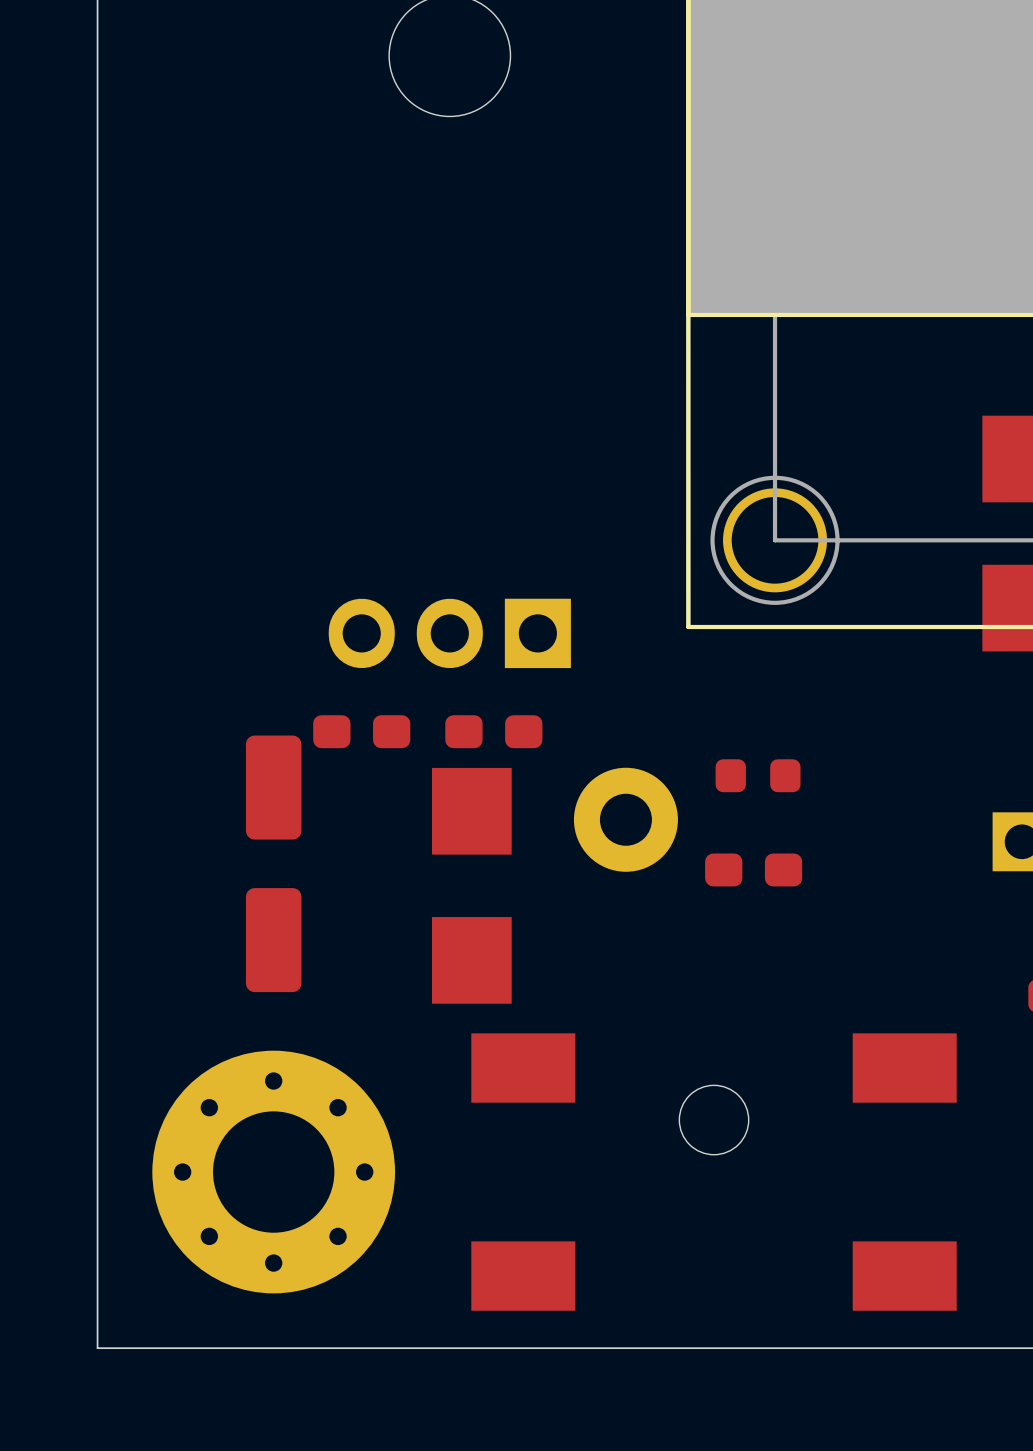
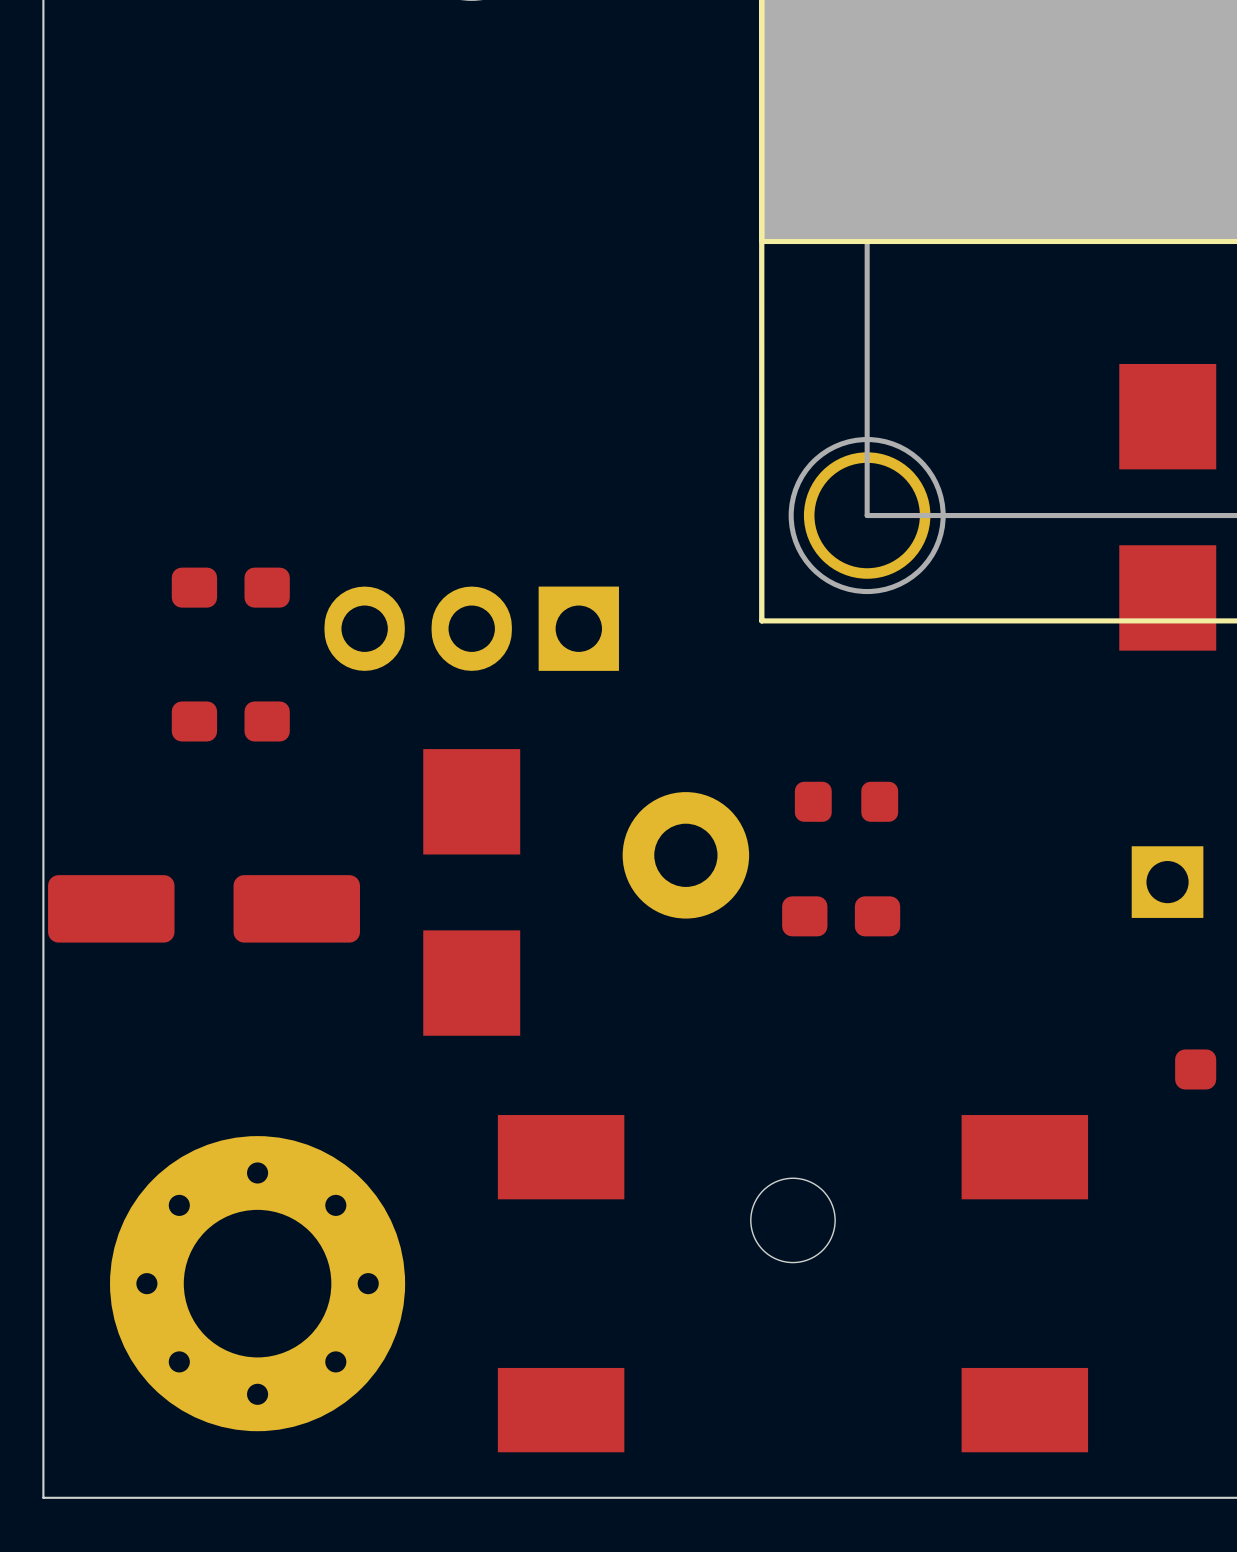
part: none -> (230, 587)
part: none -> (230, 721)
part: (361, 731) -> none
part: (493, 731) -> none
part rotation: 0° (273, 863) -> 90° clockwise (204, 908)
part position: (471, 885) -> (471, 892)

